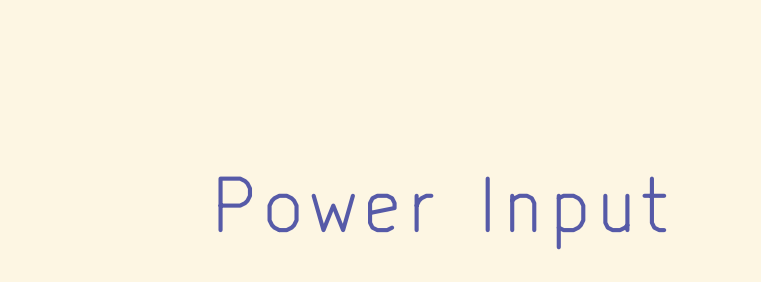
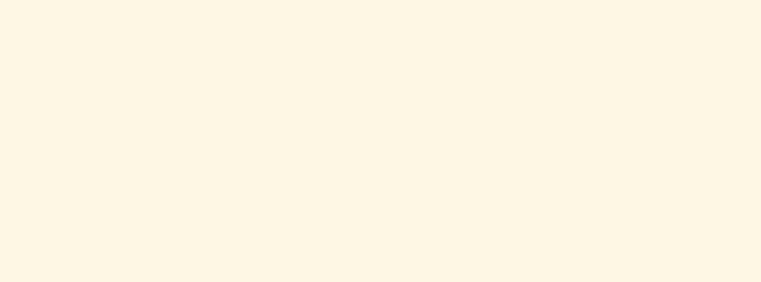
text: Power Input (442, 212) -> none

